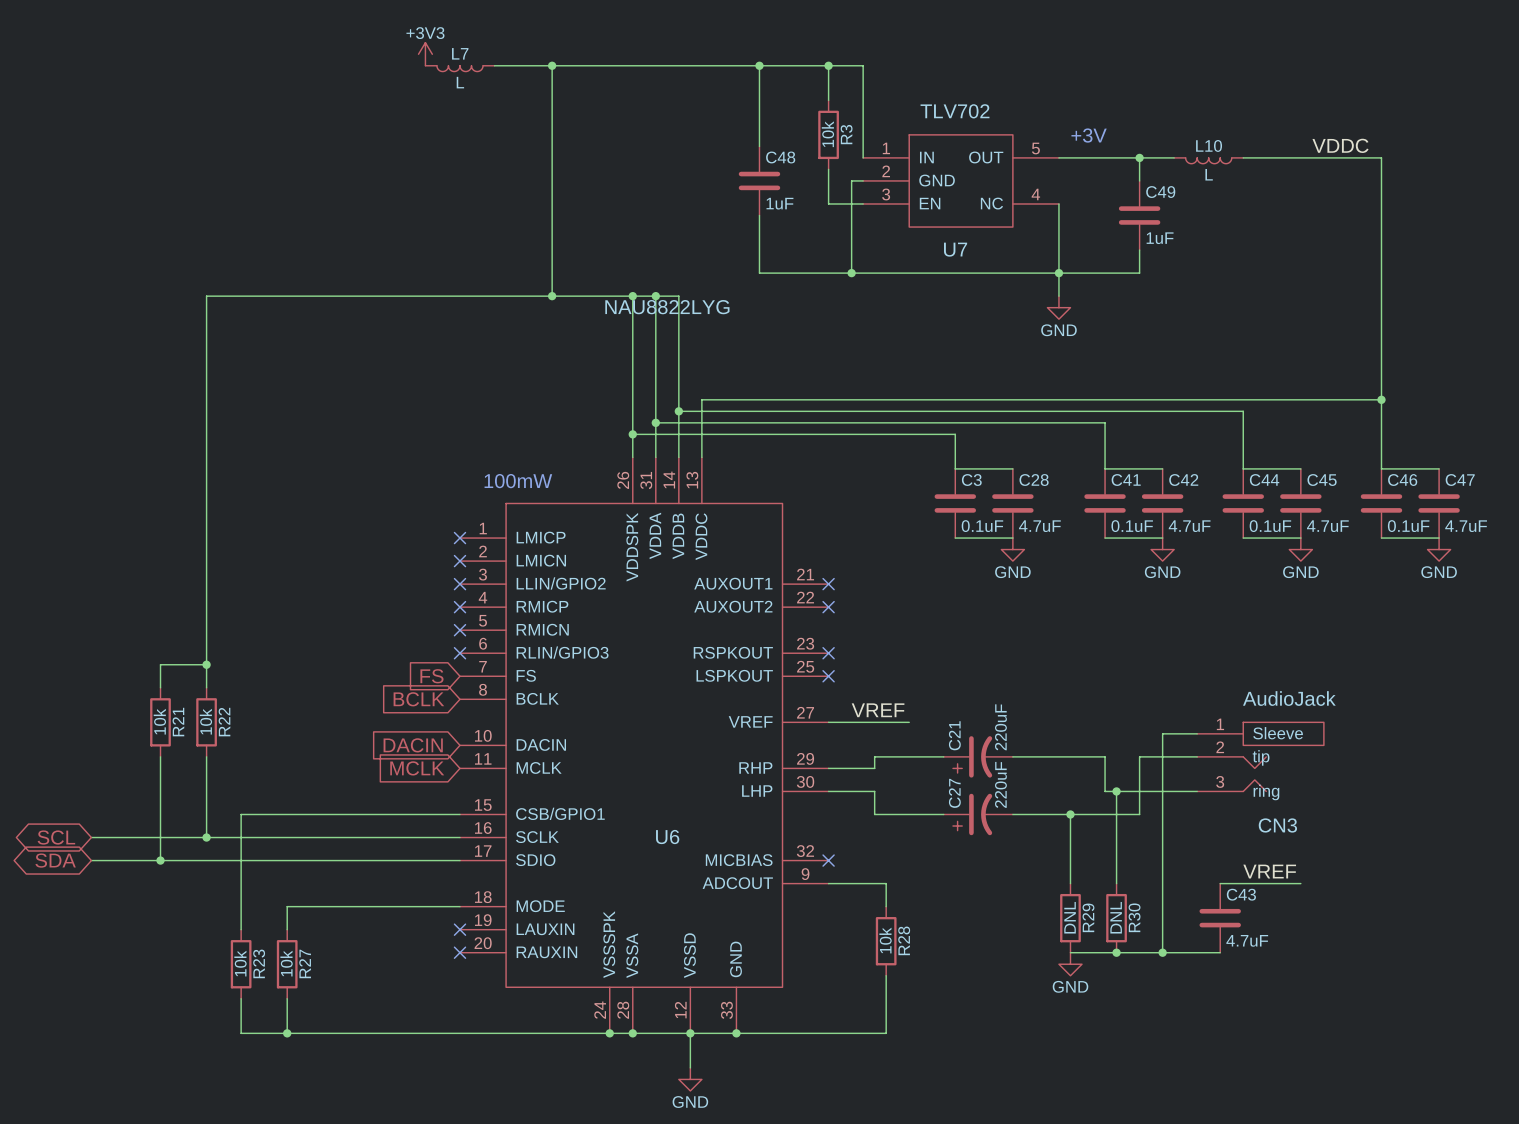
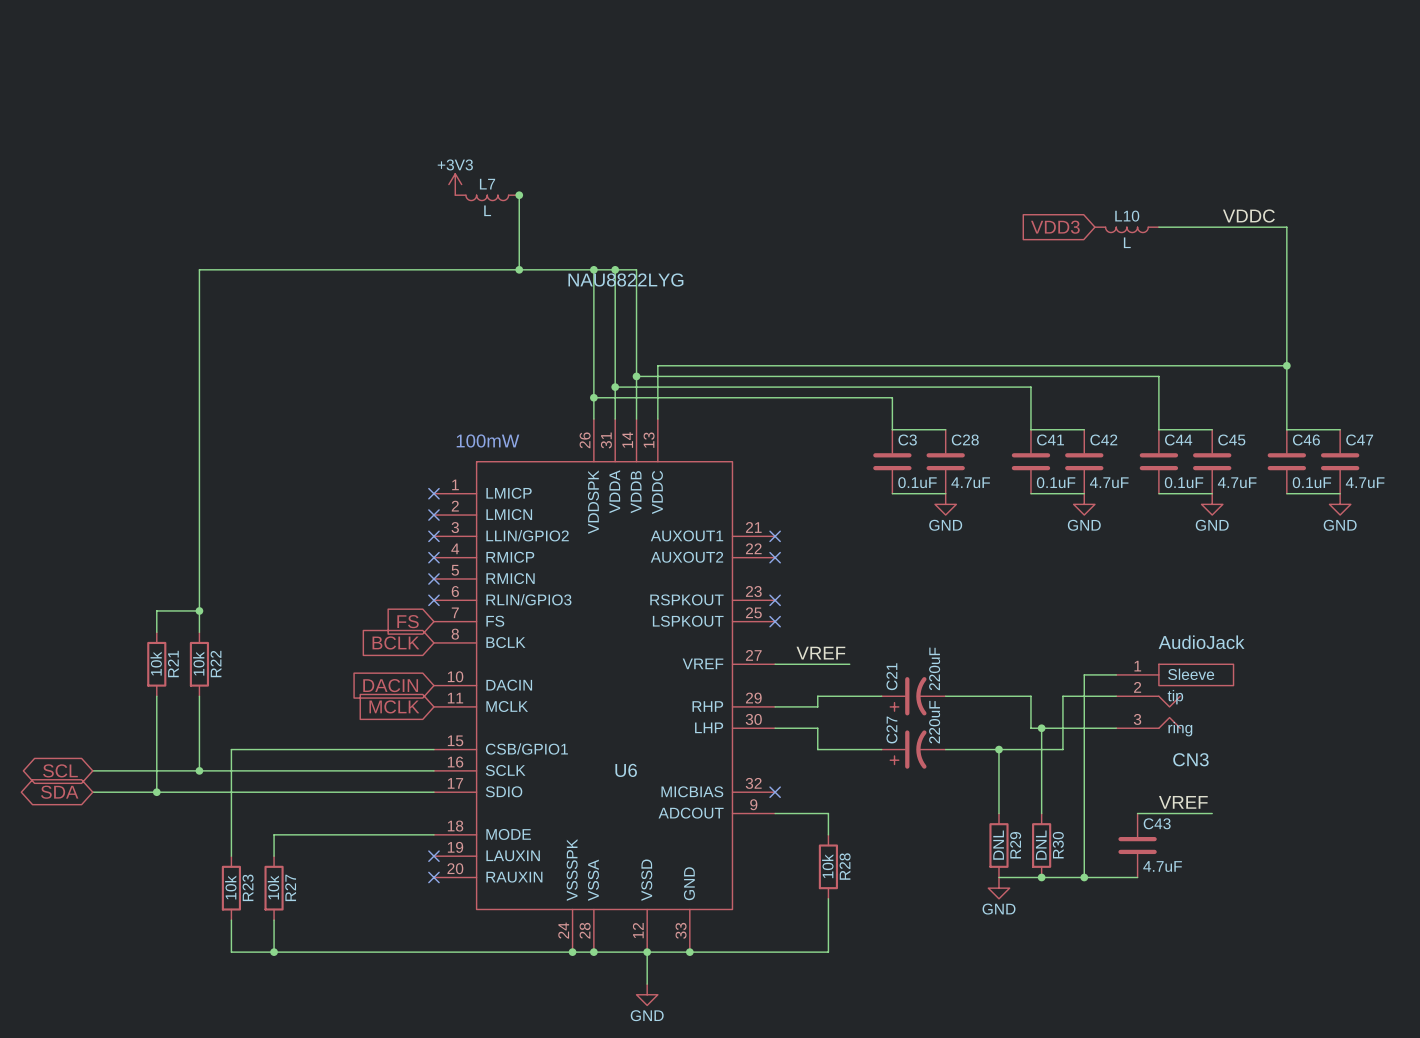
power symbol position: +3V3 (425, 54) -> +3V3 (455, 184)
wire: (494, 65) (863, 65) (863, 157) -> none
wire: (552, 65) (552, 215) -> none
junction: (552, 65) -> none
wire: (759, 65) (759, 146) -> none
junction: (759, 65) -> none
wire: (828, 65) (828, 100) -> none
junction: (828, 65) -> none
L7 position: (459, 68) -> (487, 197)
R3: 10k (828, 134) -> none
text: +3V (1089, 135) -> none
label position: VDDC (1340, 145) -> VDDC (1248, 216)
wire: (1058, 157) (1174, 157) -> none
wire: (1139, 157) (1139, 180) -> none
junction: (1139, 157) -> none
wire: (1243, 157) (1381, 157) (1381, 250) -> (1158, 227) (1286, 227)
L10 position: (1208, 160) -> (1126, 229)
wire: (828, 169) (828, 203) (863, 203) -> none
C48: 1uF (759, 180) -> none
wire: (863, 180) (851, 180) (851, 273) -> none
U7: TLV702 (961, 180) -> none
wire: (1058, 203) (1058, 296) -> none
junction: none -> (519, 195)
wire: (759, 215) (759, 273) (1139, 273) (1139, 250) -> none
C49: 1uF (1139, 215) -> none
global label: none -> VDD3 (1055, 227)
junction: (851, 273) -> none
junction: (1058, 273) -> none
power symbol: GND (1058, 307) -> none

